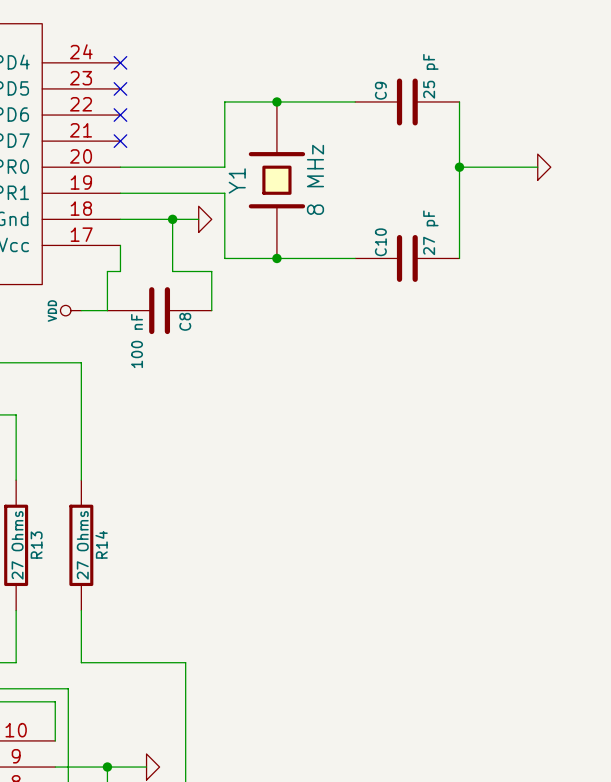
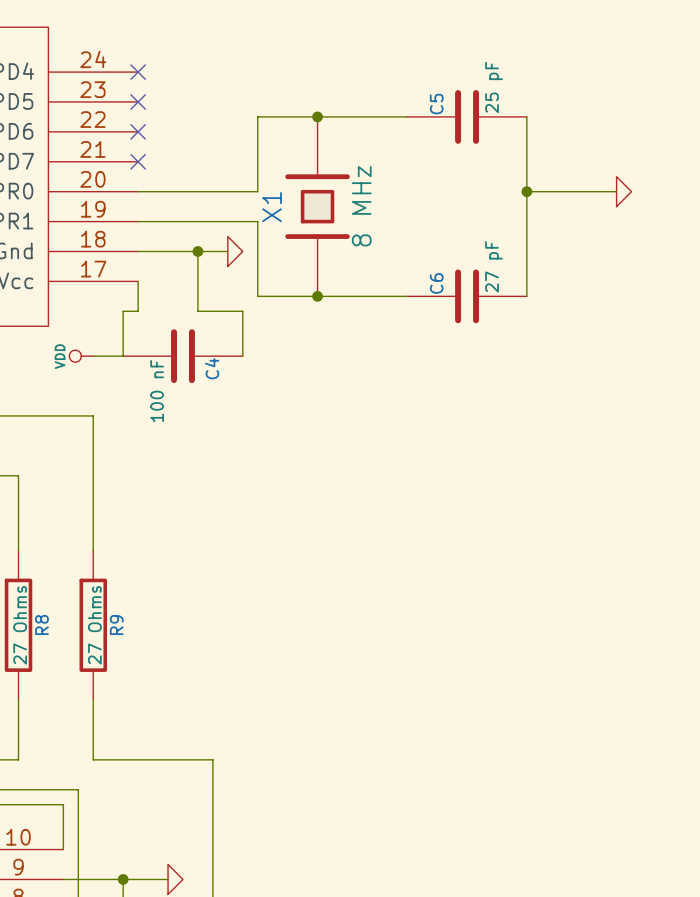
C9 name: C9 (380, 90) -> C5 (436, 104)
Y1 name: Y1 (237, 180) -> X1 (272, 207)
C10 name: C10 (380, 242) -> C6 (436, 283)
C8 name: C8 (185, 321) -> C4 (212, 368)
R14 name: R14 (101, 544) -> R9 (116, 625)
R13 name: R13 (36, 545) -> R8 (41, 625)

